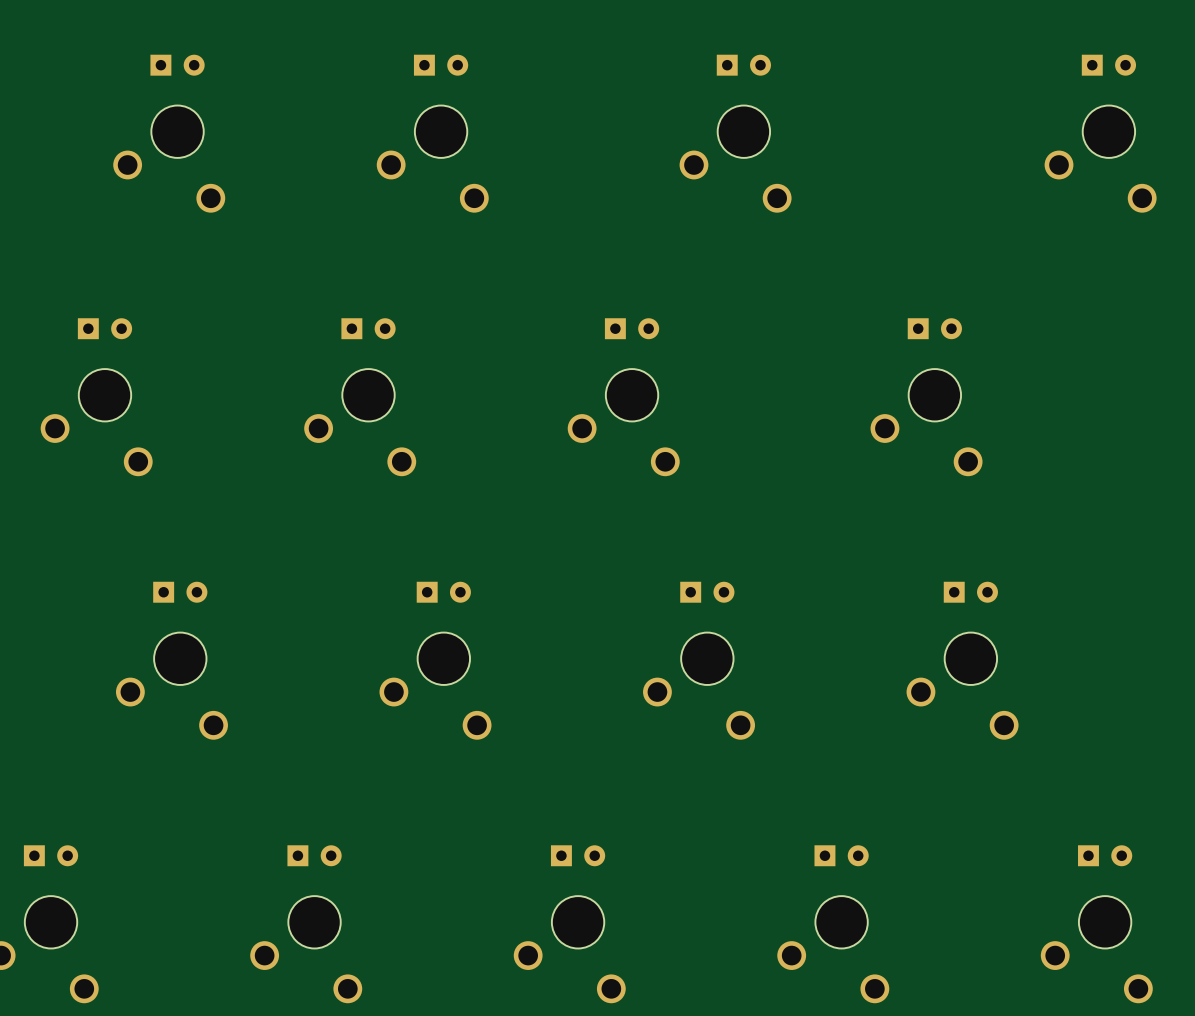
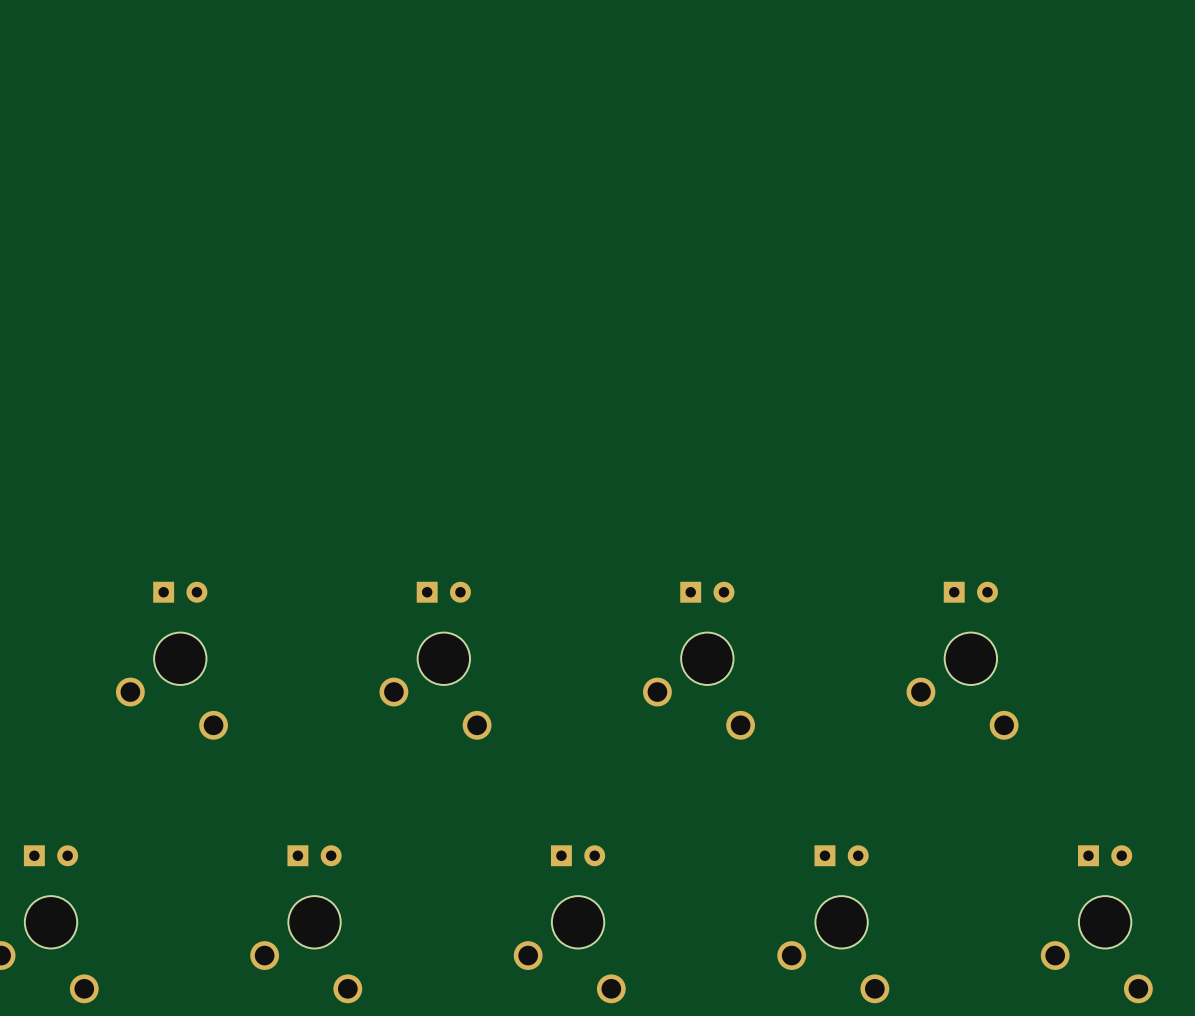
part: (169, 133) -> none
part: (432, 133) -> none
part: (735, 133) -> none
part: (1100, 133) -> none
part: (96, 397) -> none
part: (360, 397) -> none
part: (623, 397) -> none
part: (926, 397) -> none

